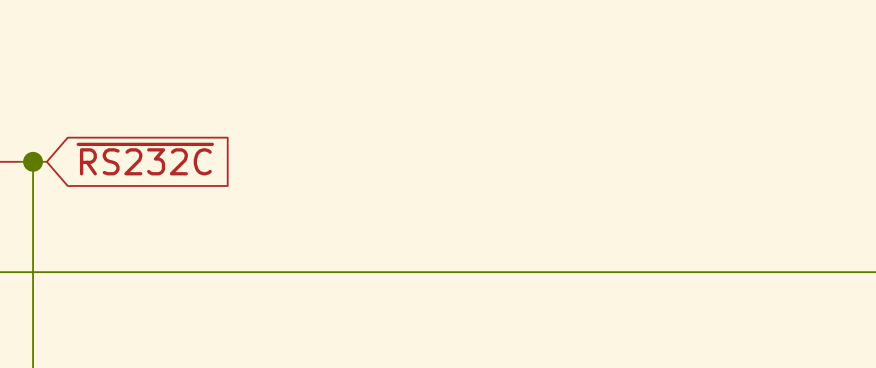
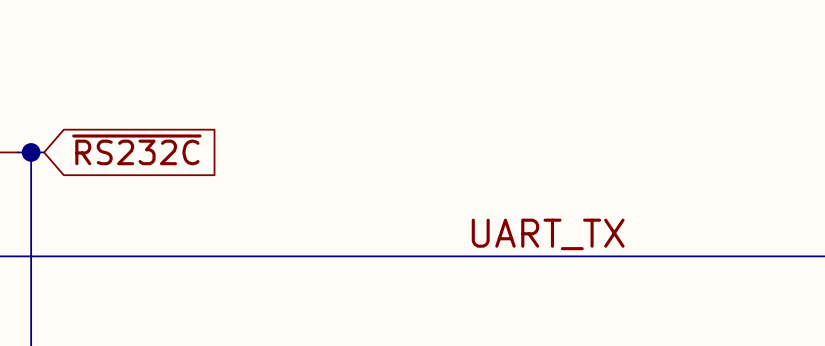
label: none -> UART_TX (548, 234)

